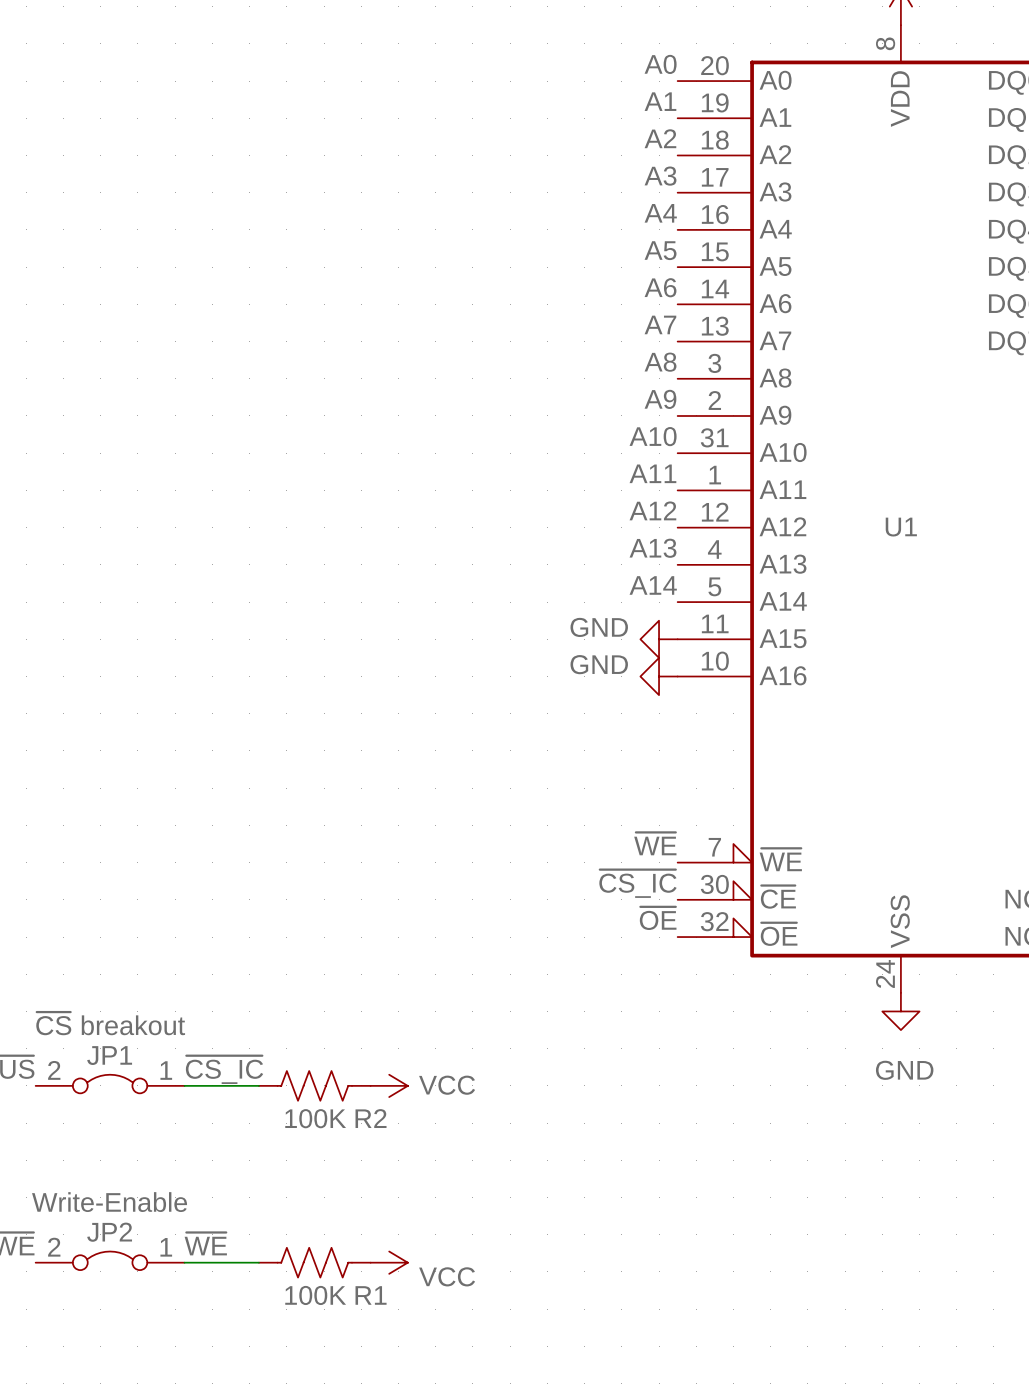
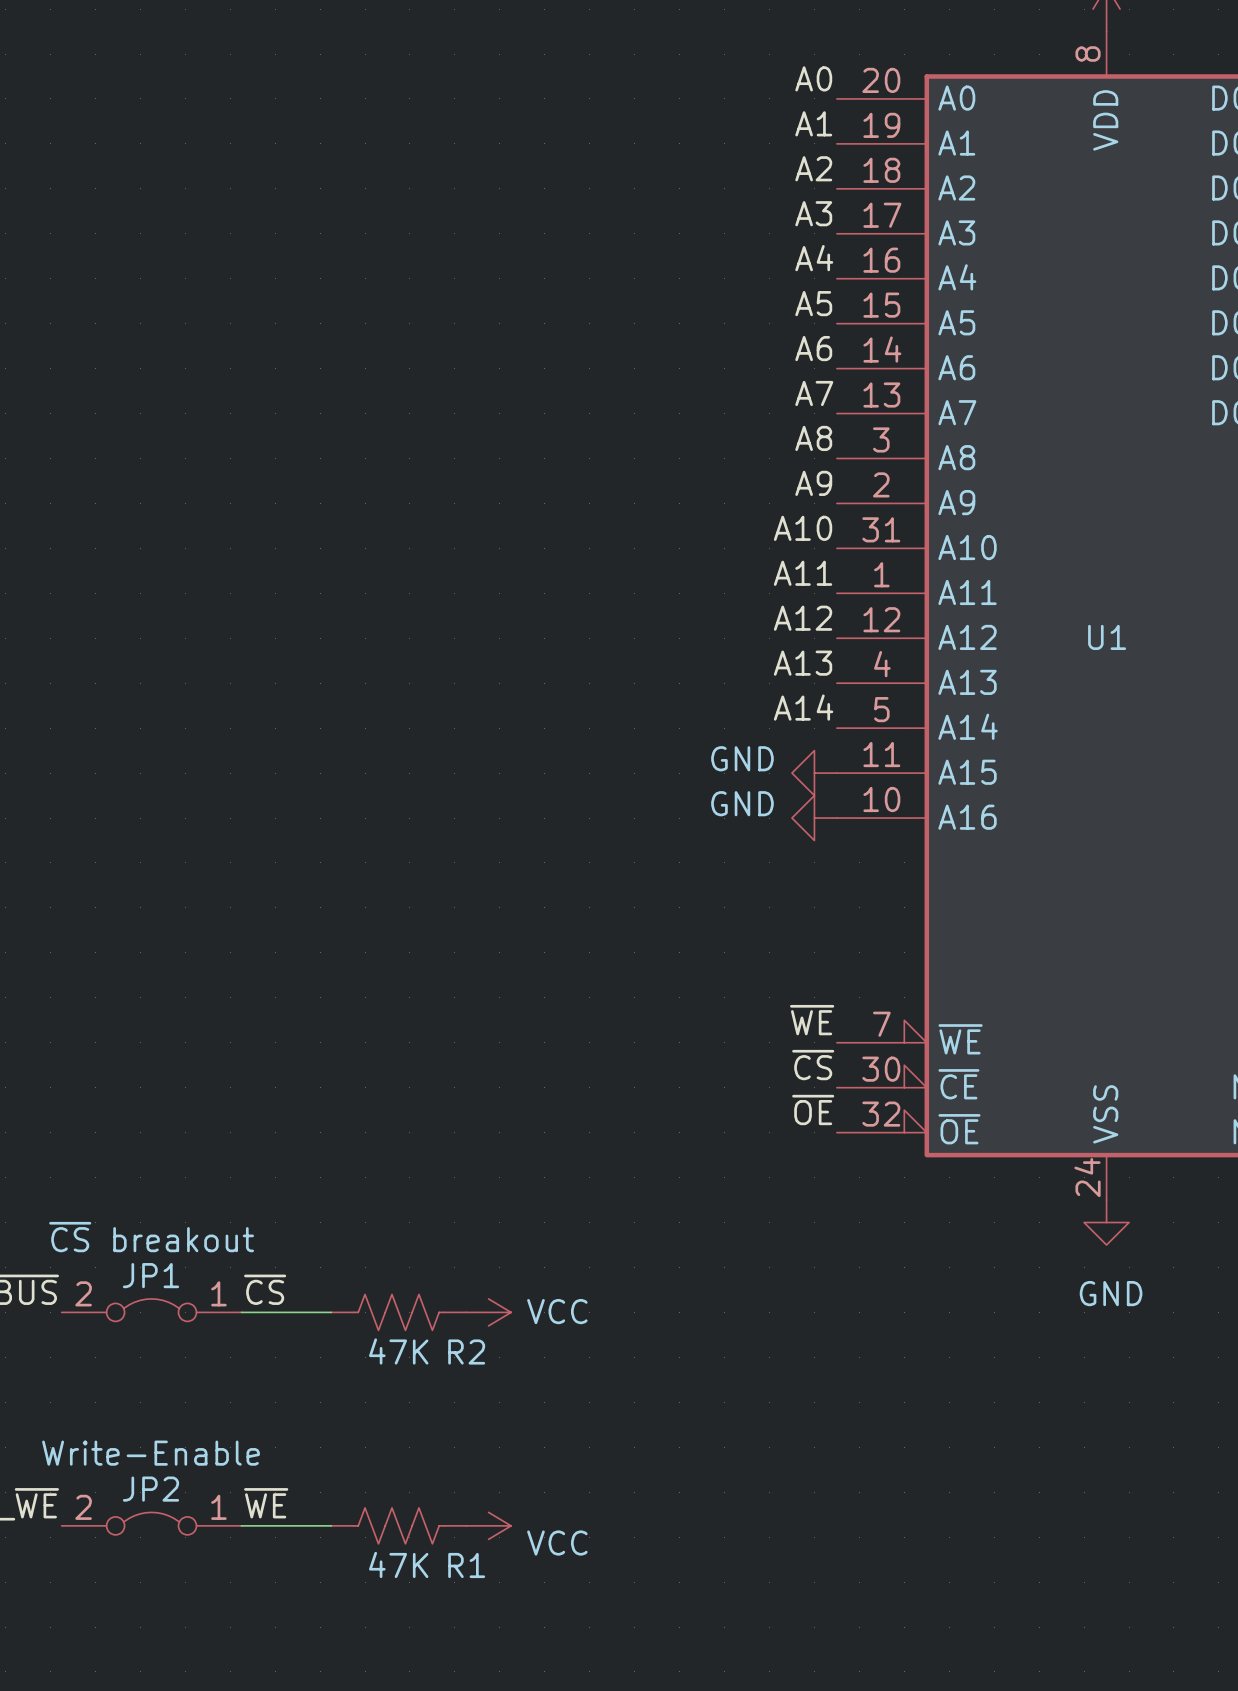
label: ~{CS_IC} (637, 883) -> ~{CS} (813, 1065)
label: ~{CS_IC} (224, 1069) -> ~{CS} (265, 1289)
R2 value: 100K (315, 1118) -> 47K (398, 1351)
R1 value: 100K (315, 1295) -> 47K (398, 1564)

